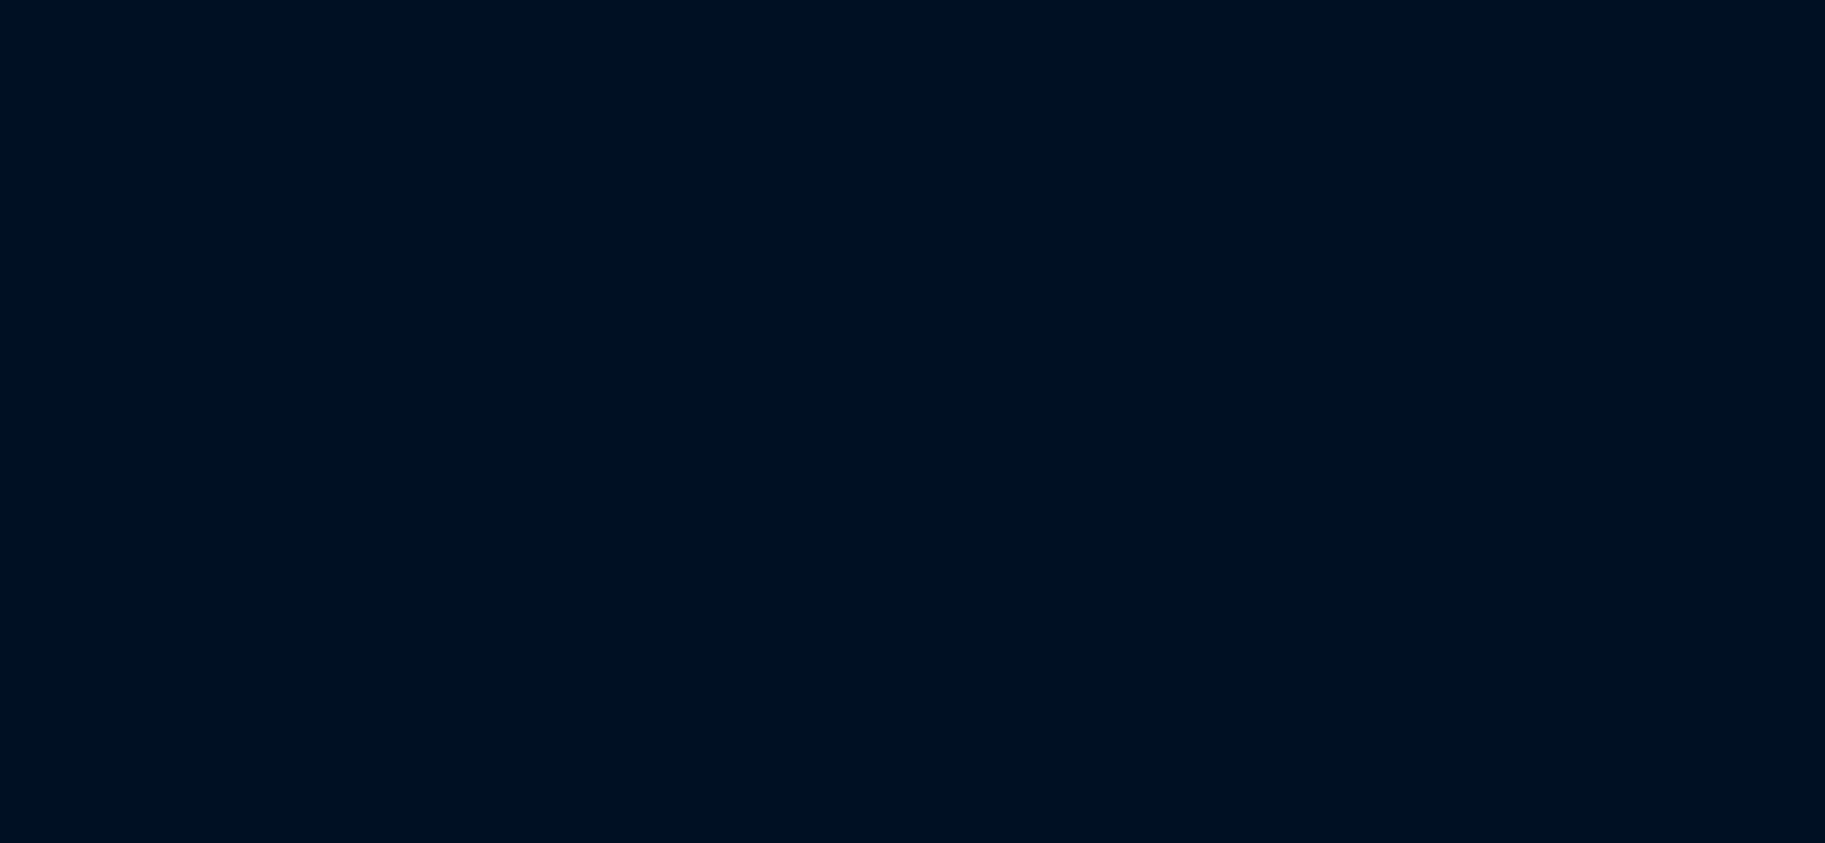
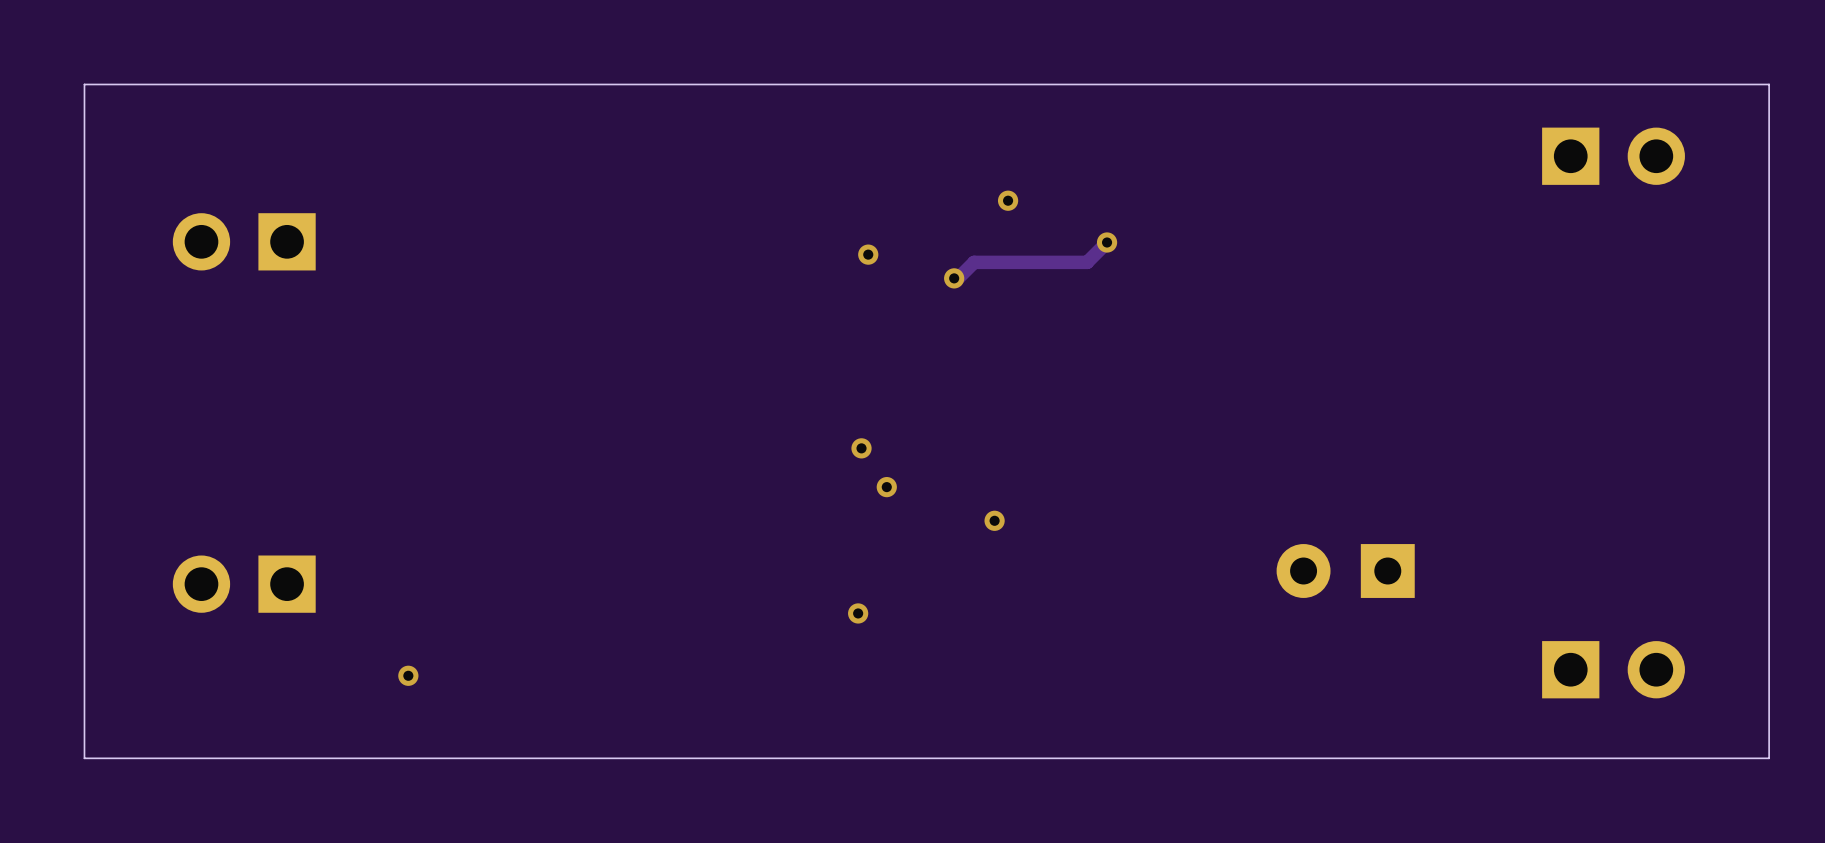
board edge: none -> (1769, 84) (84, 84) (84, 758) (1769, 758) (1769, 84)
part: none -> (1613, 156)
via: none -> (1008, 200)
part: none -> (244, 241)
track: none -> (1107, 242) (1087, 262) (974, 262) (958, 278) (954, 278)
via: none -> (1107, 242)
via: none -> (868, 254)
via: none -> (954, 278)
via: none -> (861, 448)
via: none -> (886, 487)
via: none -> (994, 520)
part: none -> (1345, 571)
part: none -> (244, 584)
via: none -> (858, 613)
part: none -> (1613, 669)
via: none -> (408, 675)

